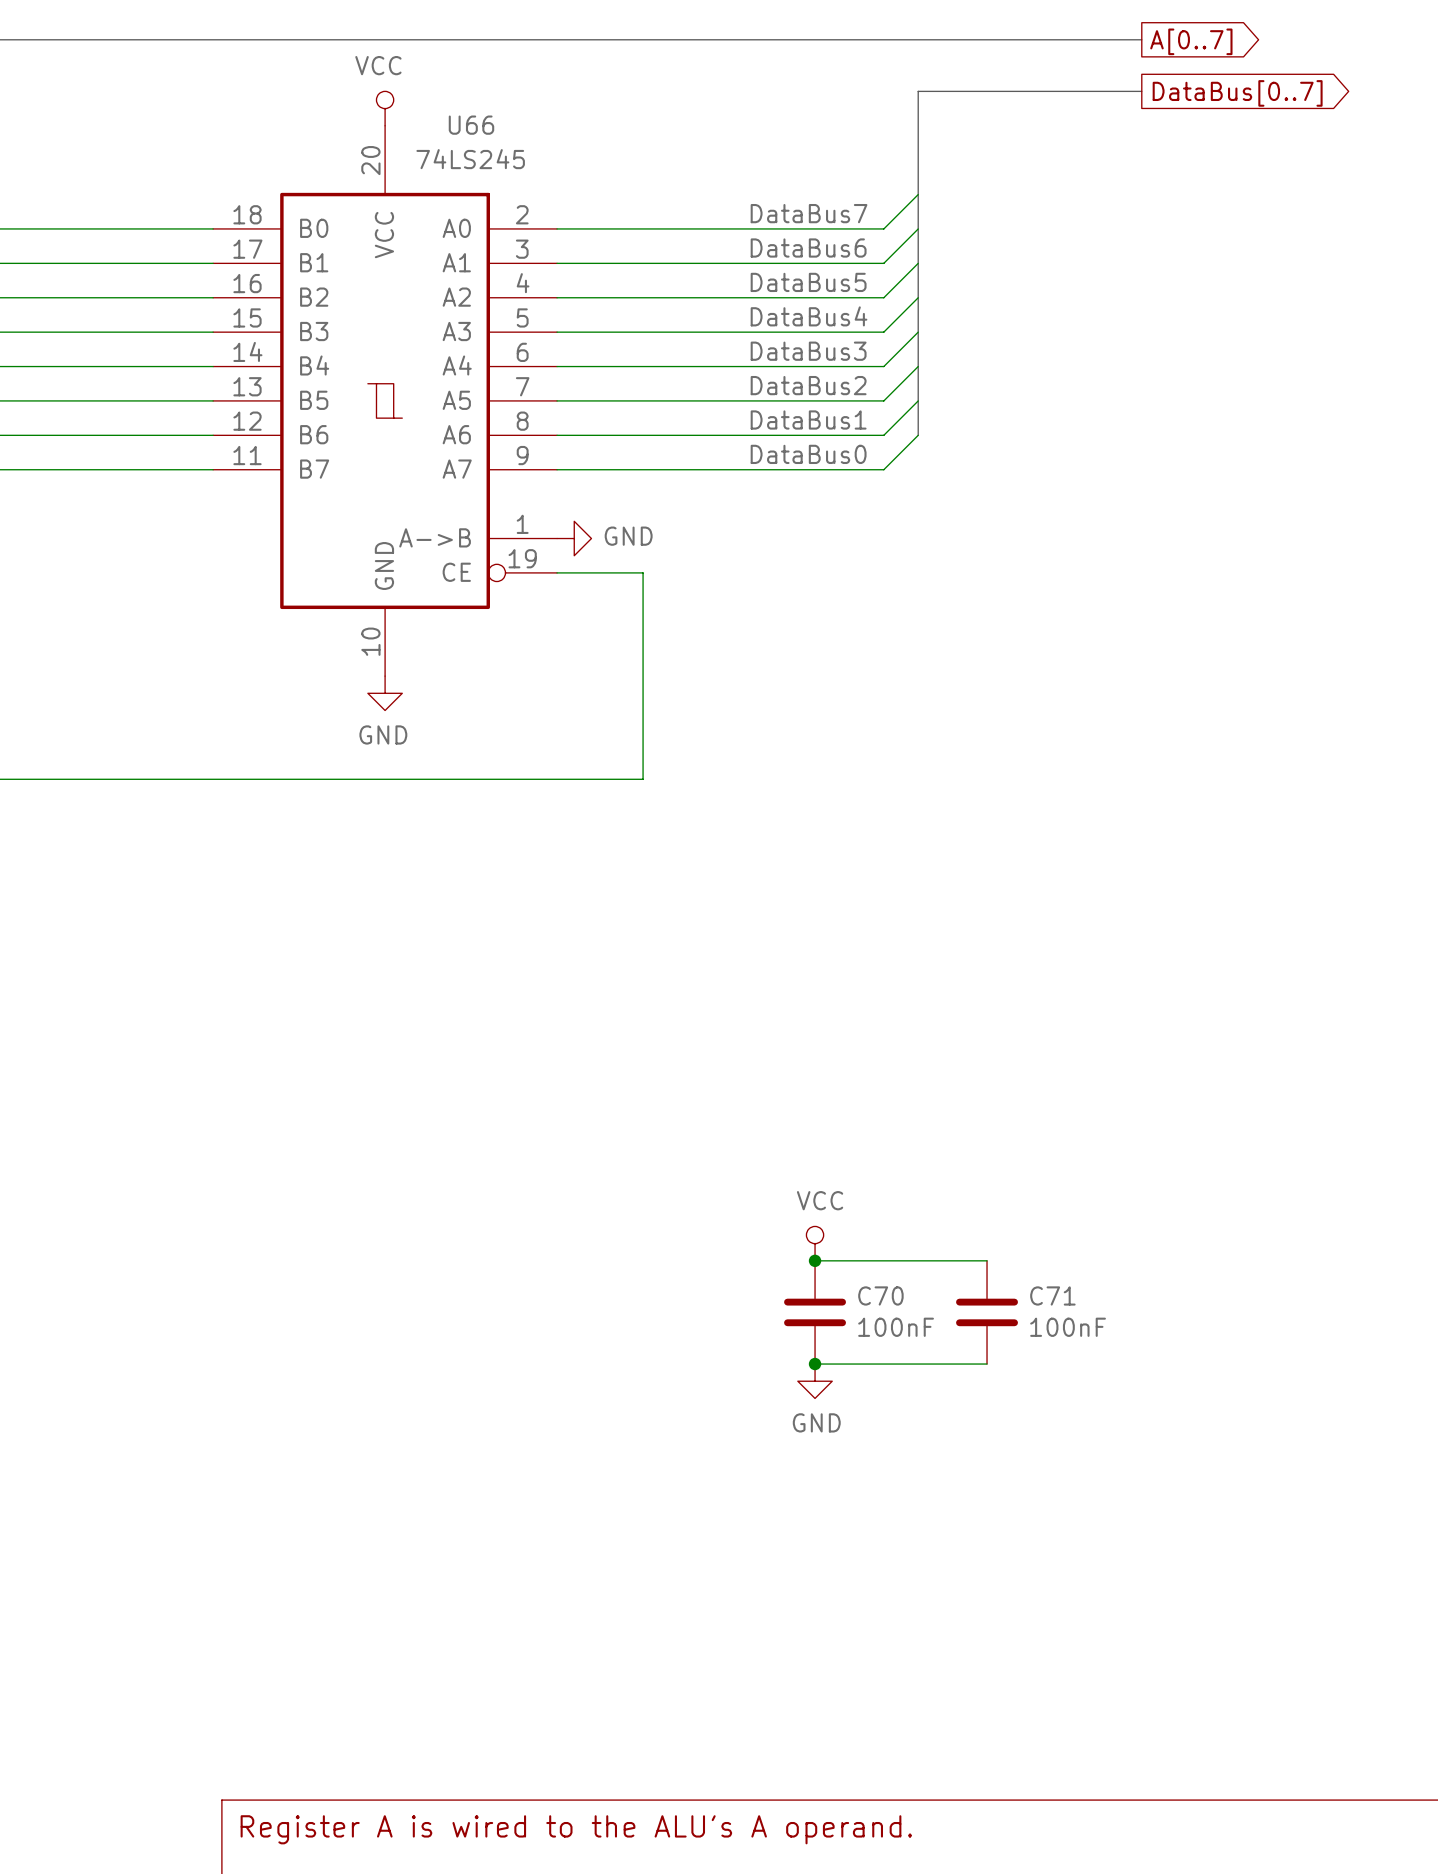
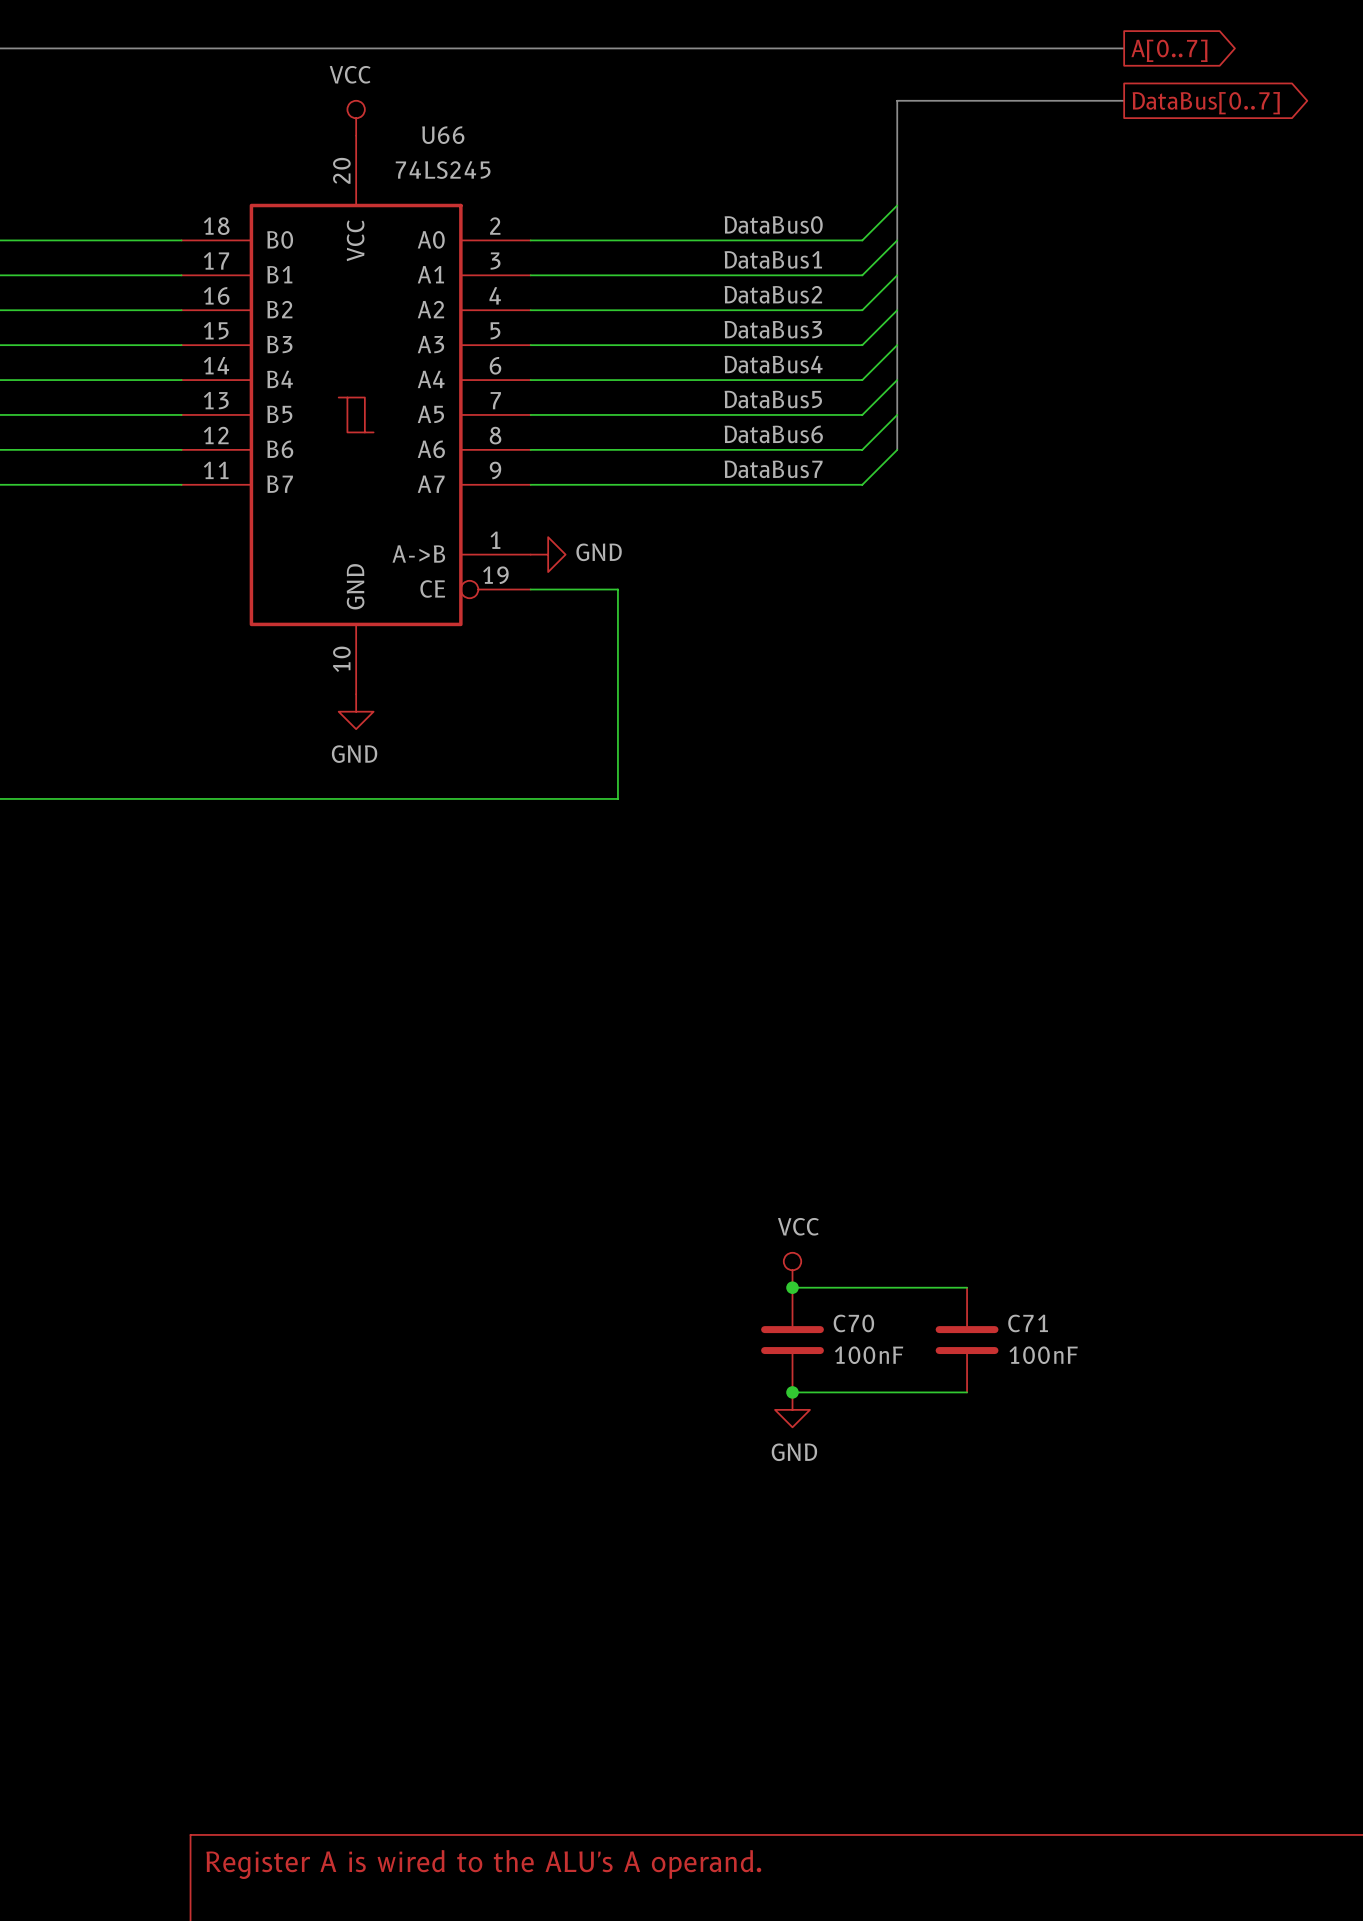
label: DataBus7 (809, 213) -> DataBus0 (773, 224)
label: DataBus6 (808, 248) -> DataBus1 (773, 259)
label: DataBus5 (808, 282) -> DataBus2 (773, 294)
label: DataBus4 (809, 316) -> DataBus3 (773, 329)
label: DataBus3 (808, 351) -> DataBus4 (773, 364)
label: DataBus2 (808, 385) -> DataBus5 (773, 399)
label: DataBus1 (808, 419) -> DataBus6 (773, 434)
label: DataBus0 (808, 454) -> DataBus7 (773, 469)

